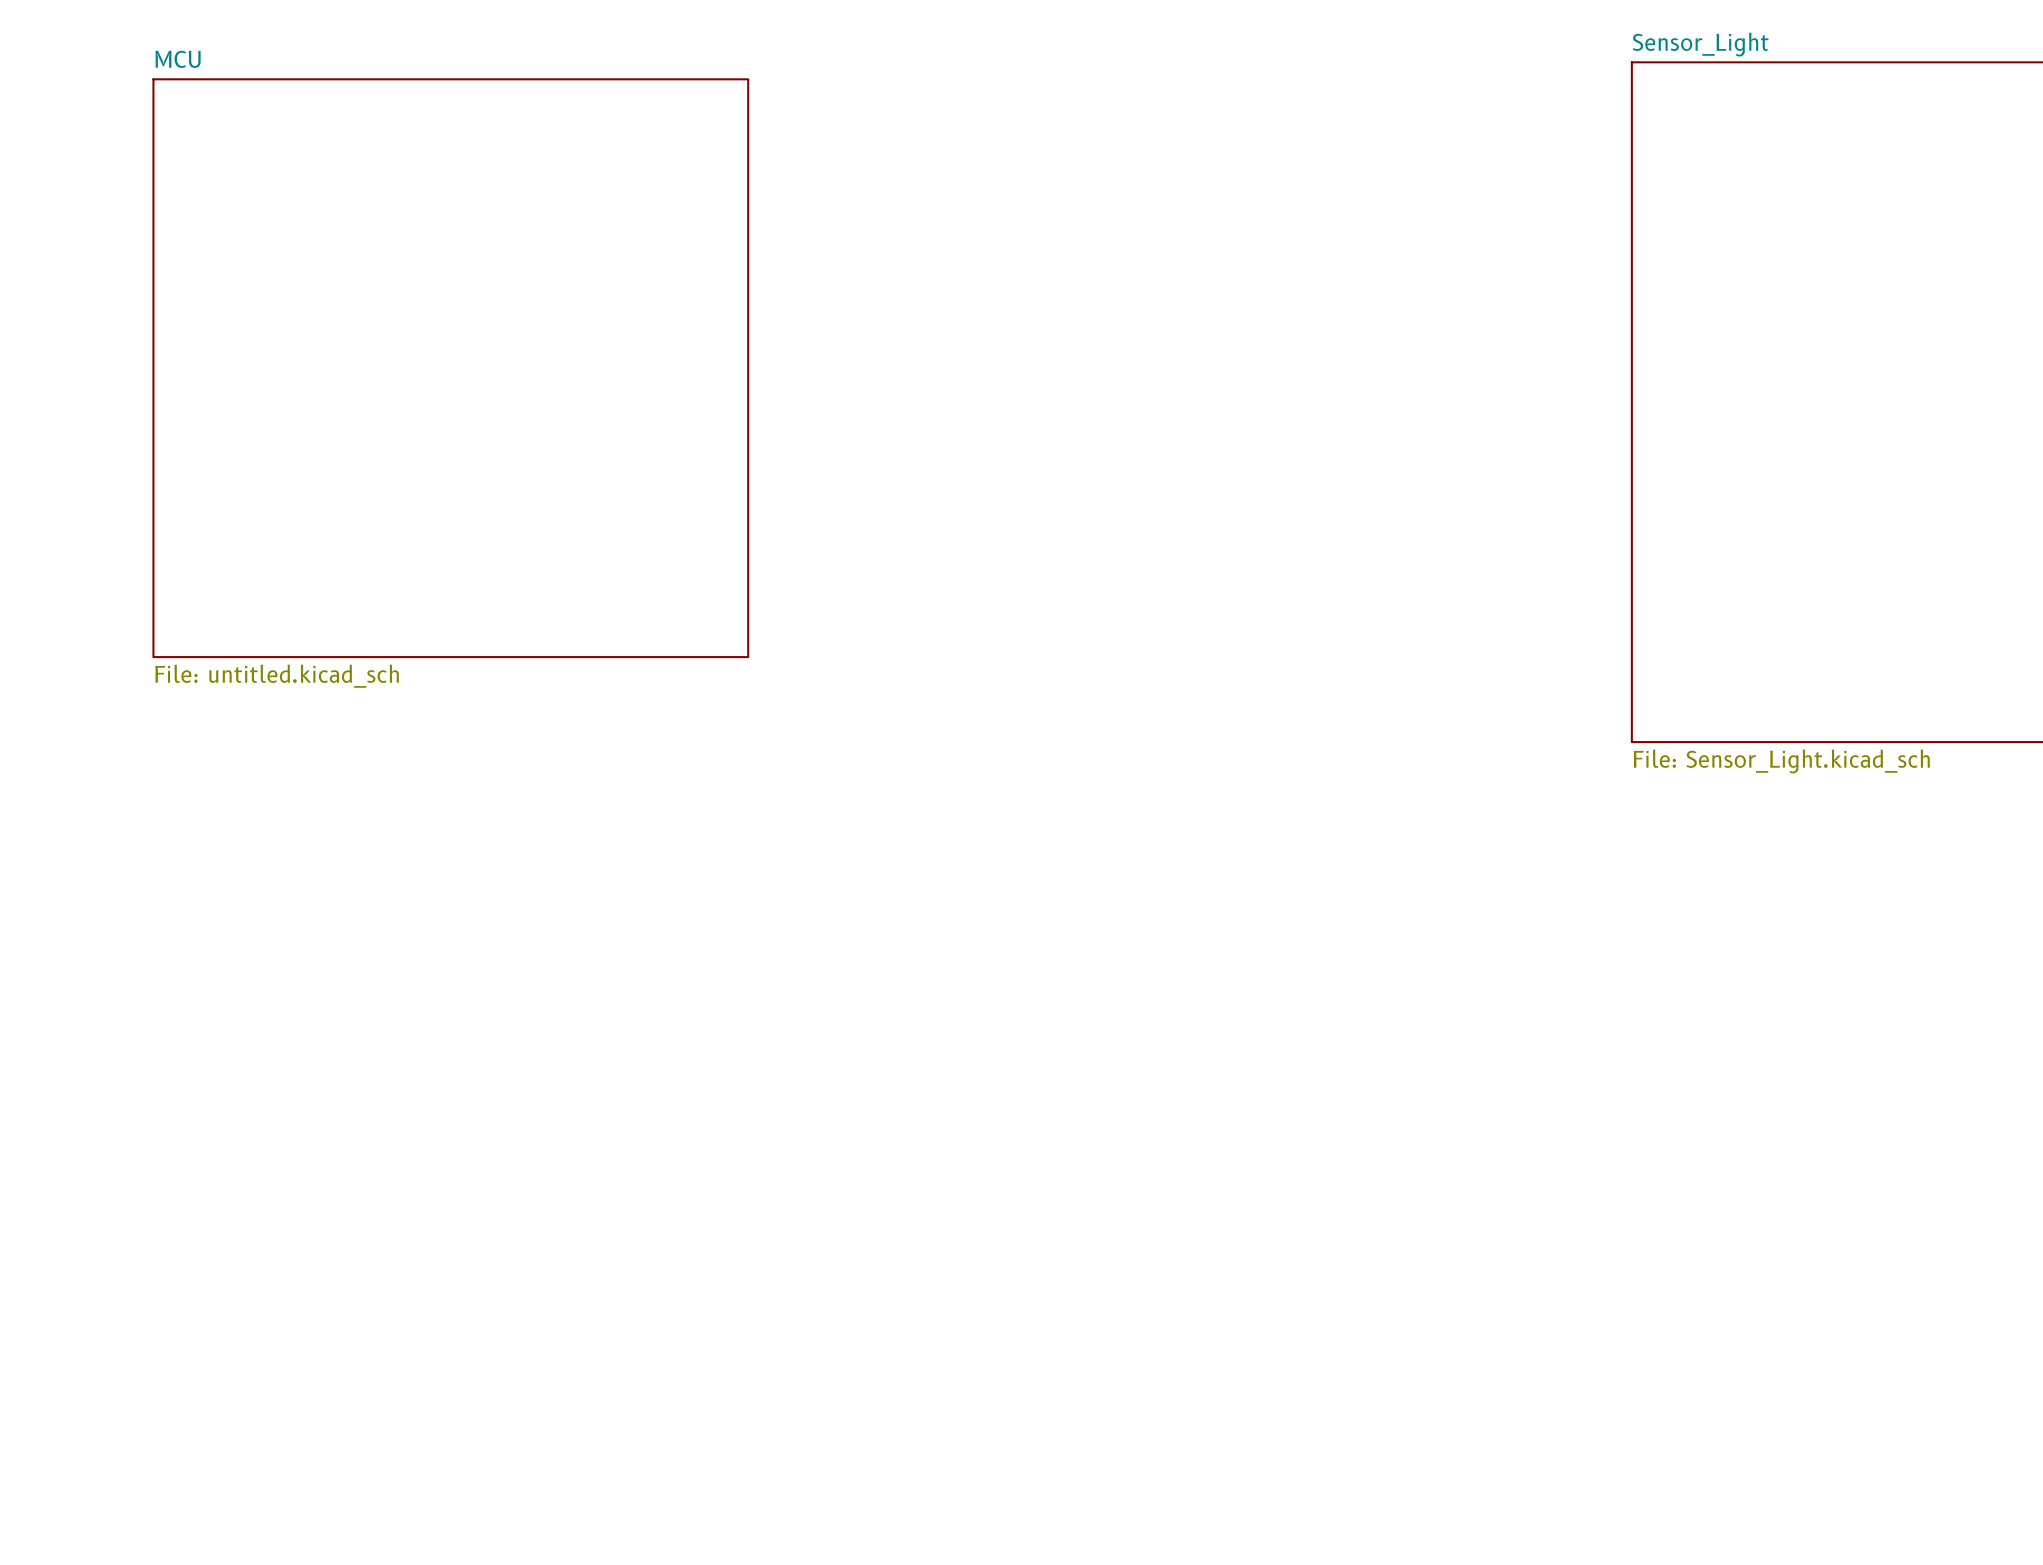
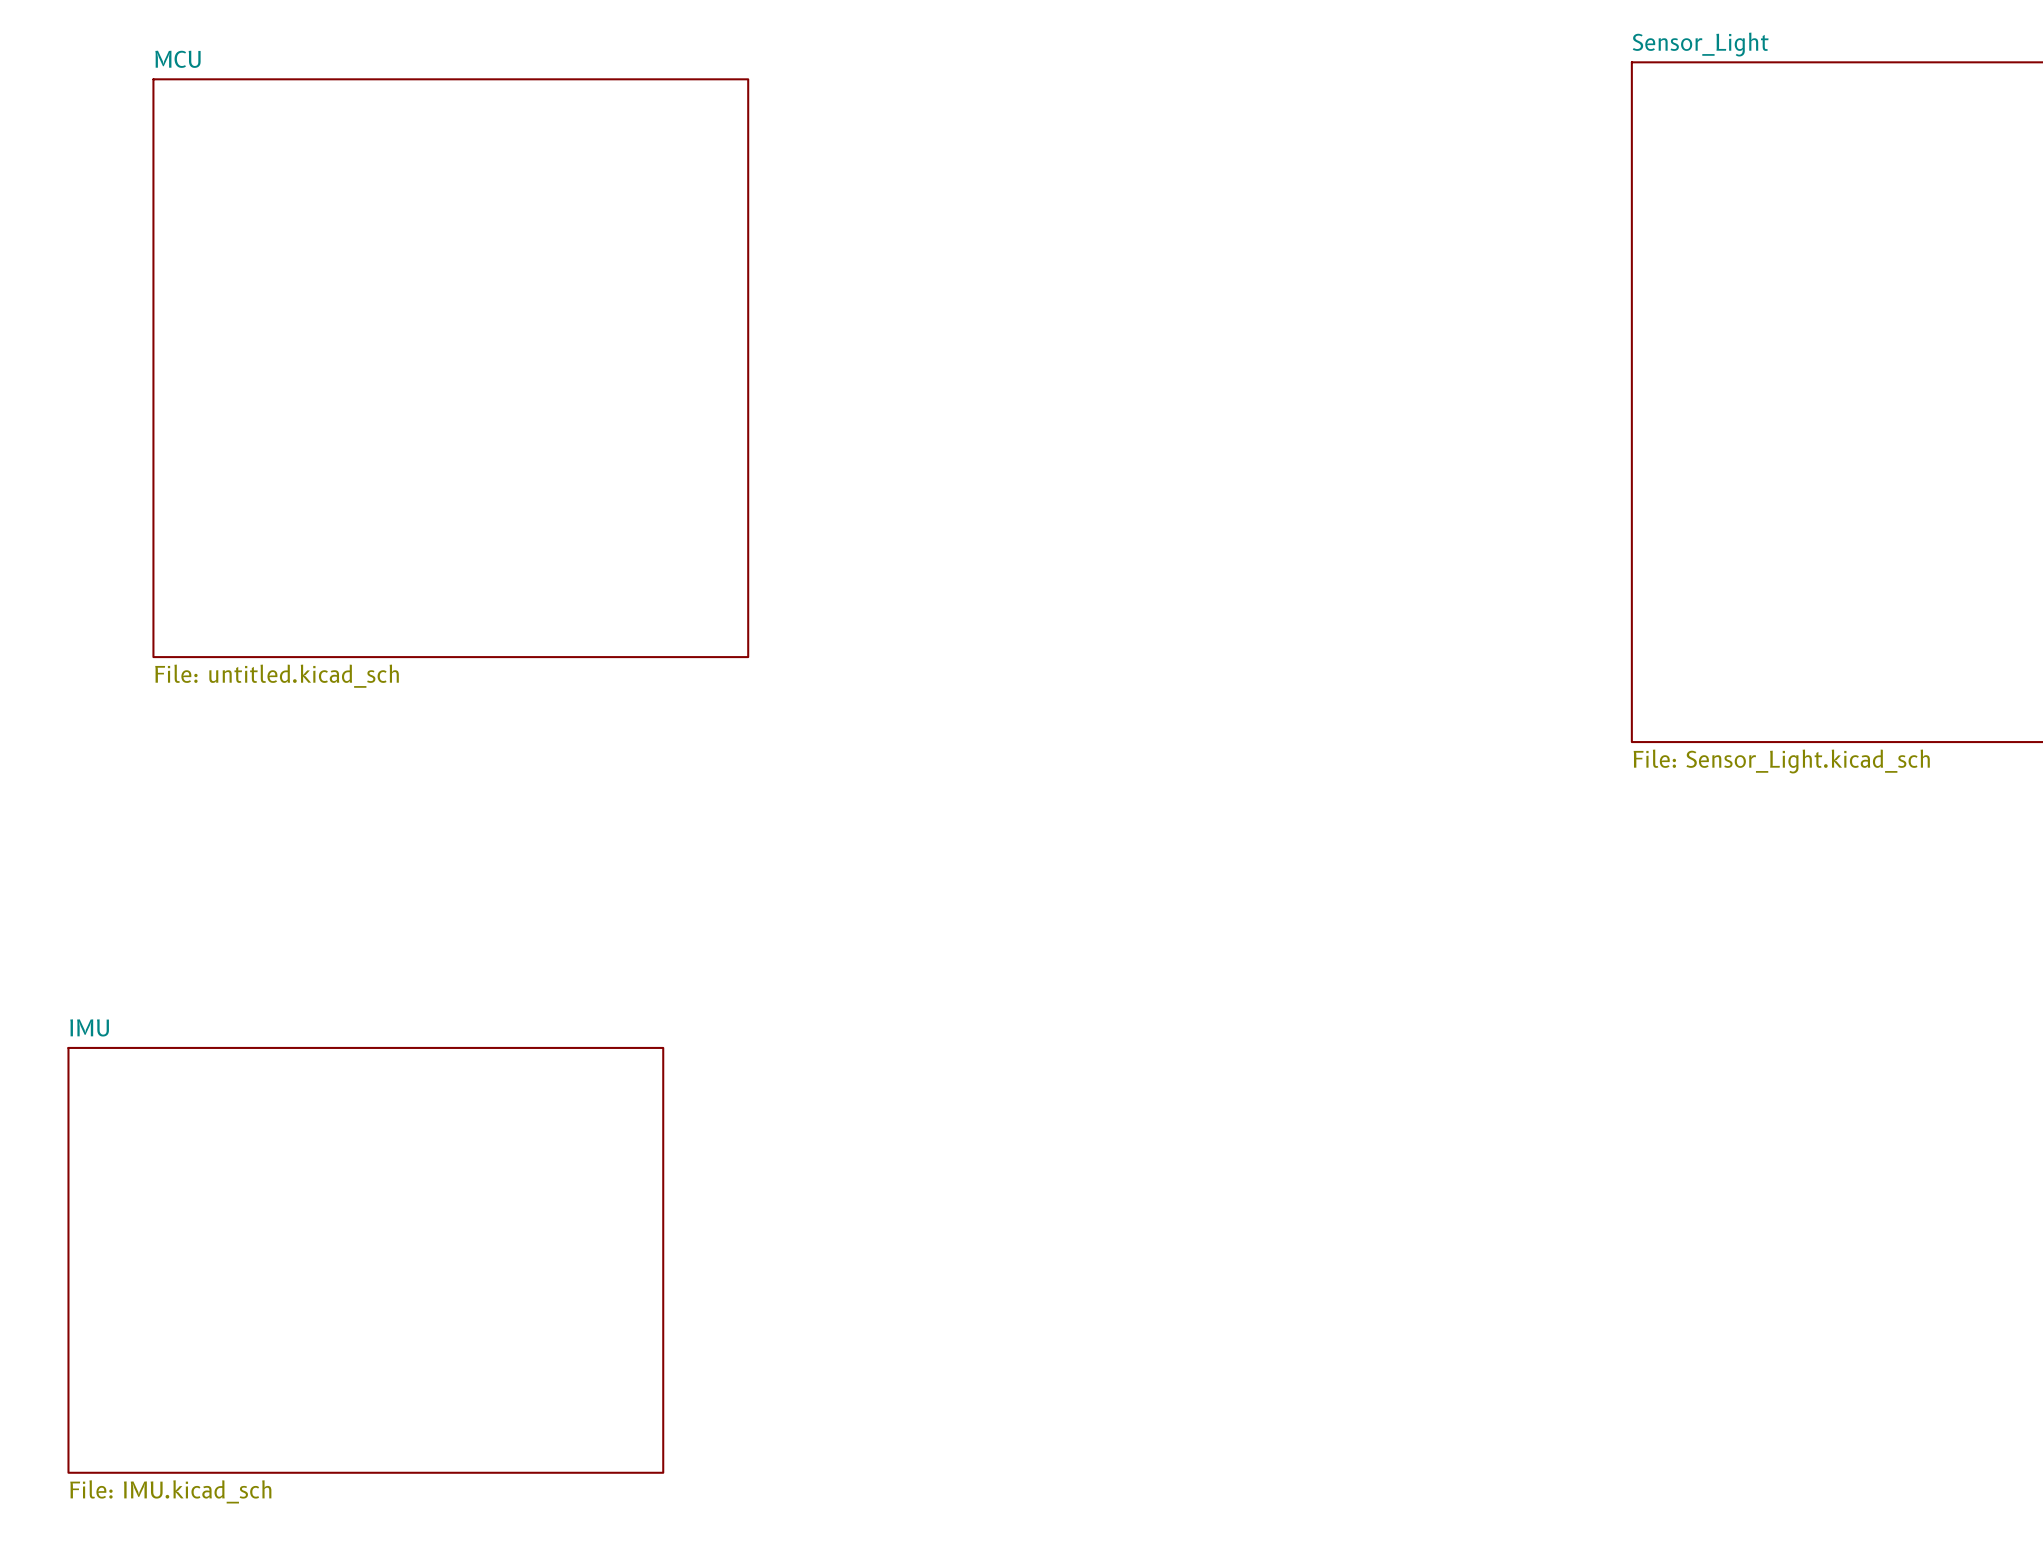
sheet IMU: none -> File: IMU.kicad_sch (365, 1260)

